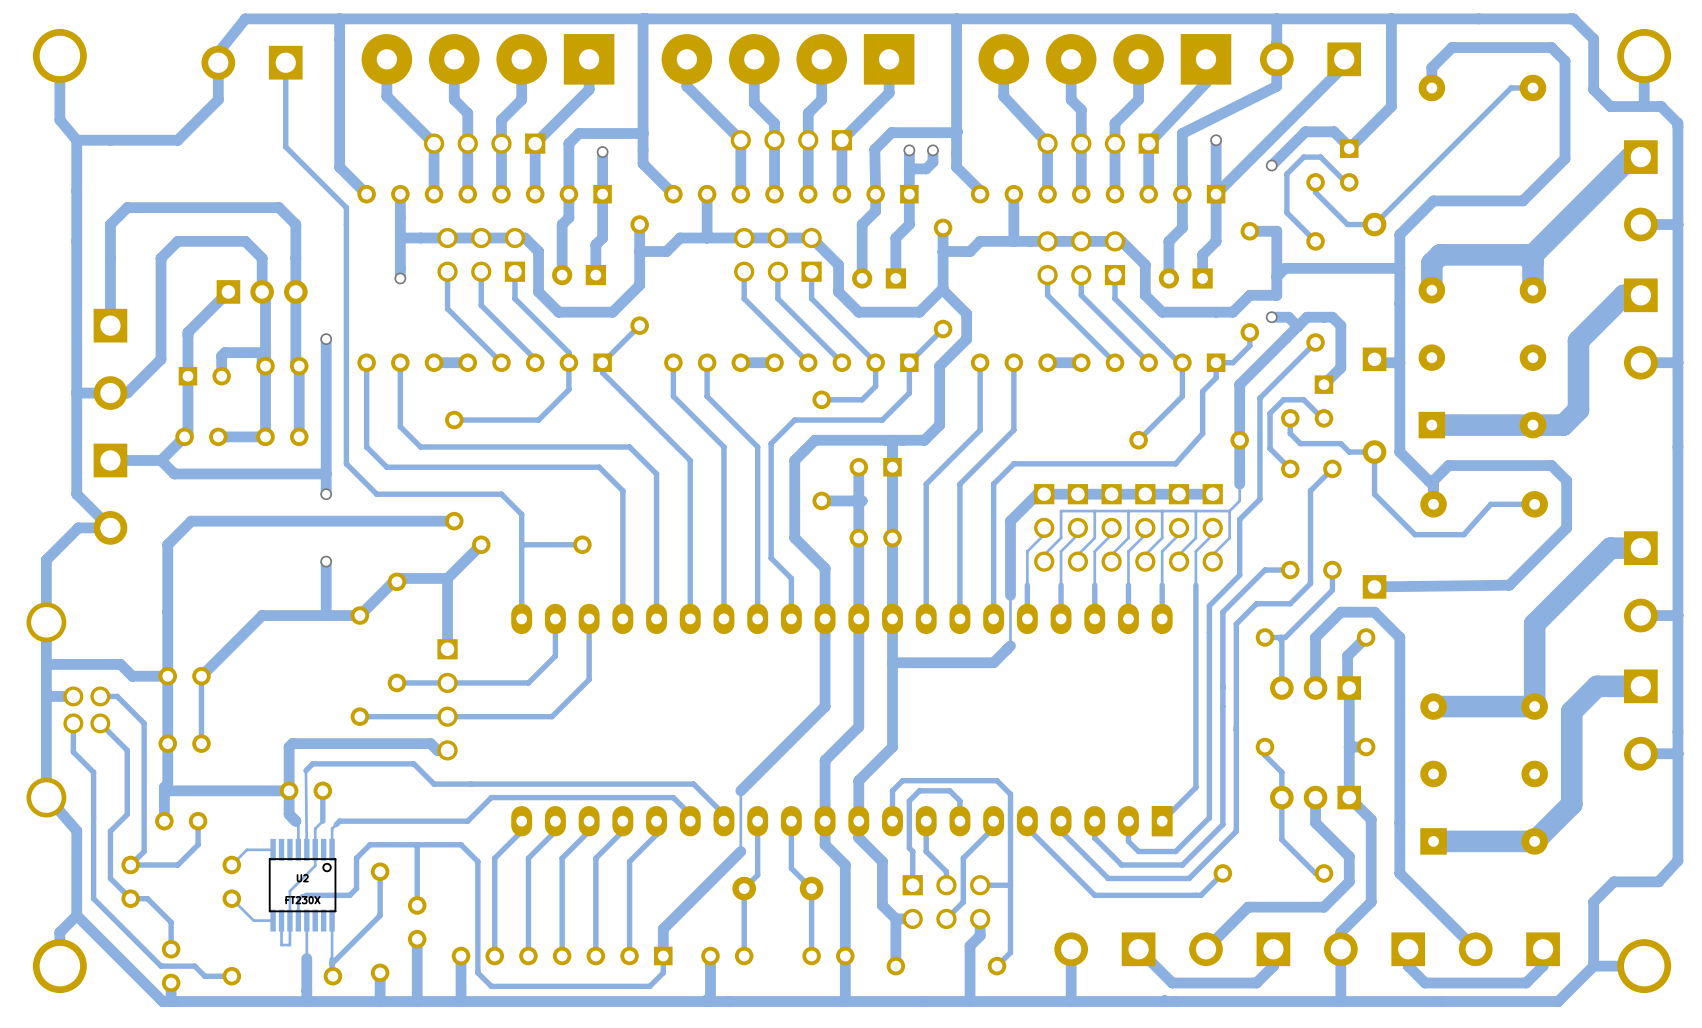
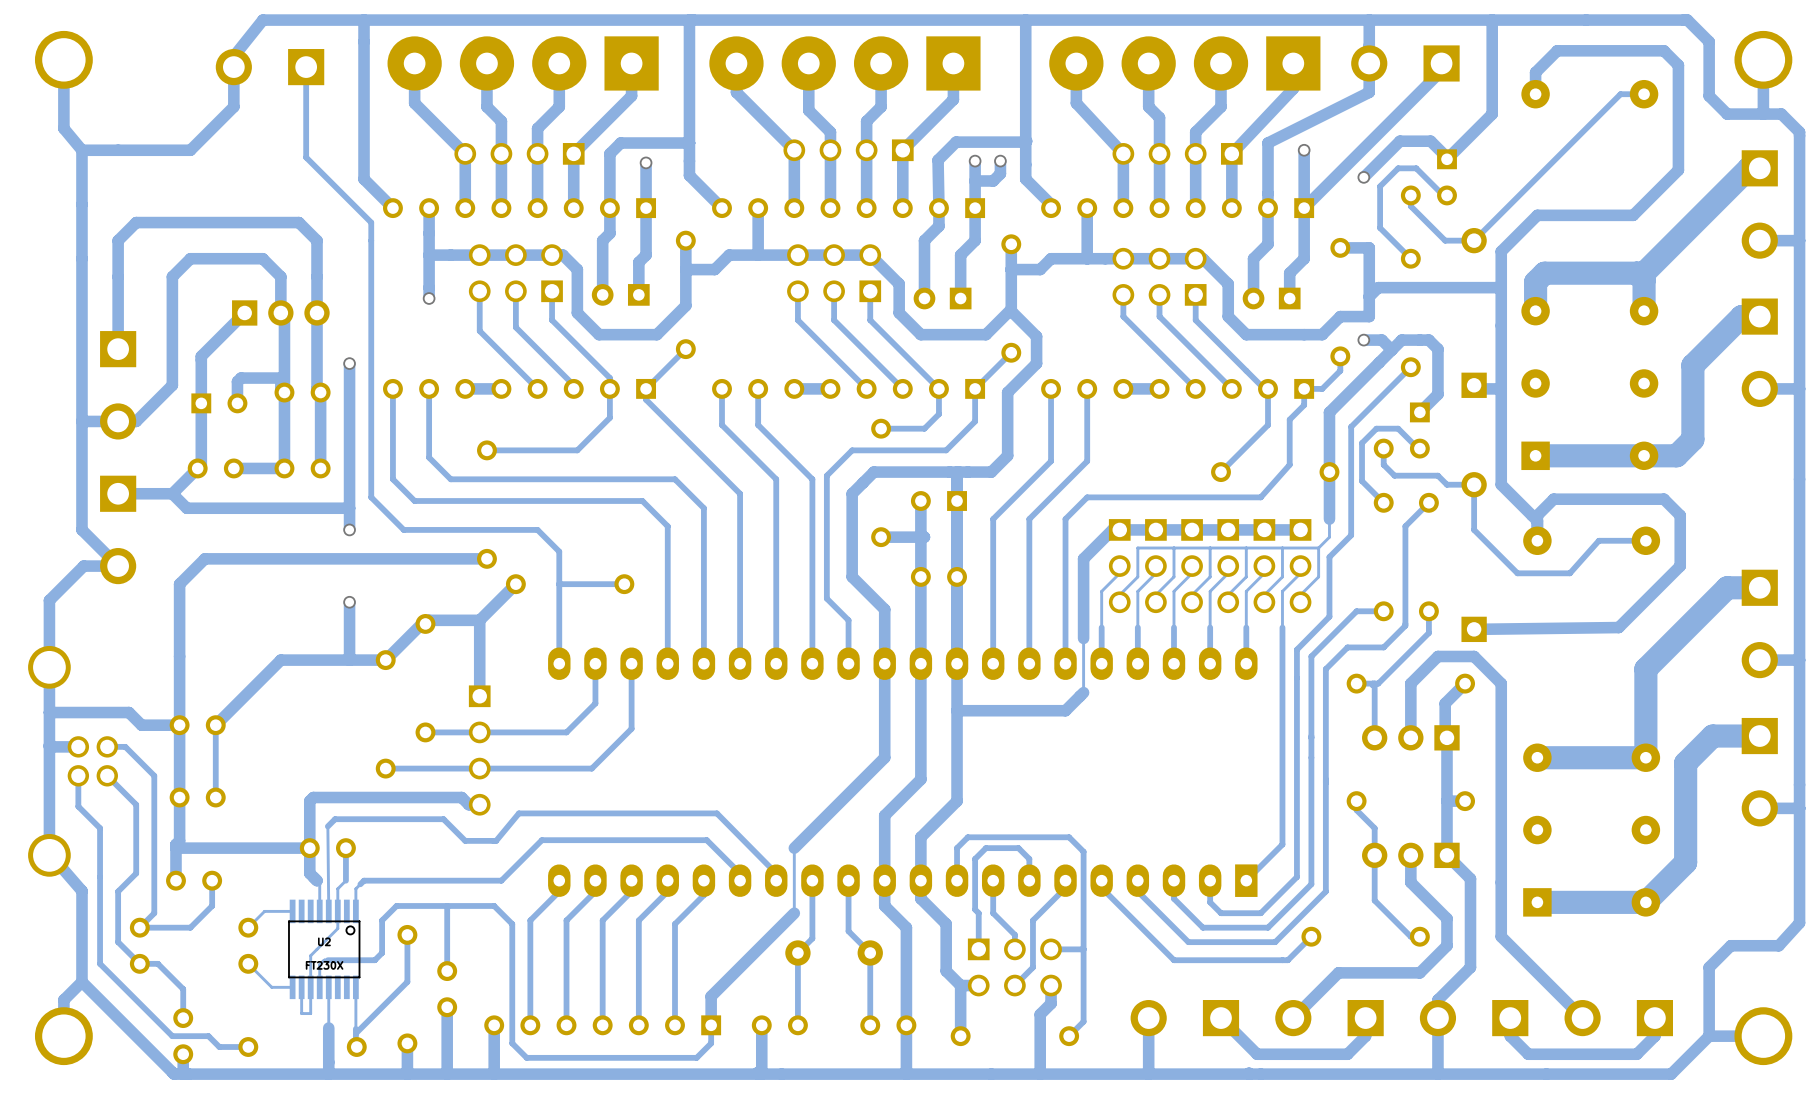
track: (462, 784) (693, 784) (723, 814) -> (496, 840) (518, 813) (716, 813) (776, 873)
track: (673, 797) (491, 797) -> (722, 855) (706, 840) (541, 840) (526, 855)

